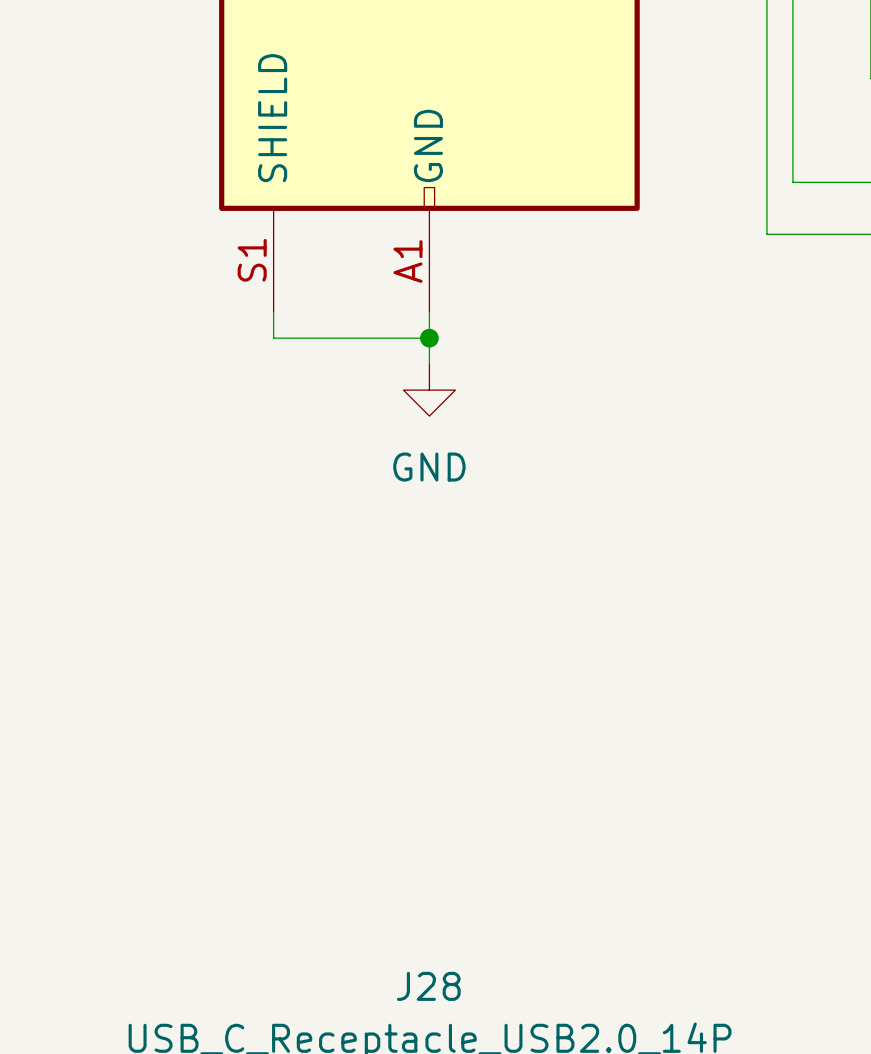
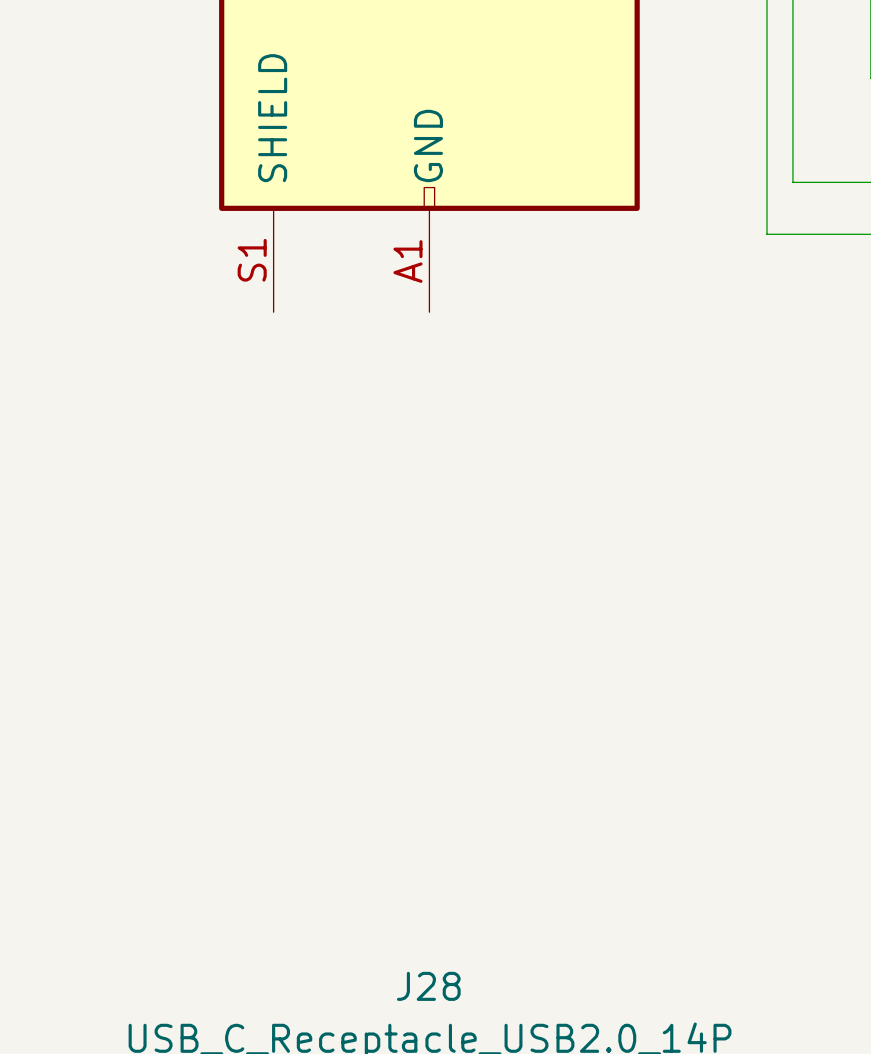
wire: (273, 312) (273, 338) (429, 338) -> none
wire: (429, 312) (429, 364) -> none
junction: (429, 338) -> none
power symbol: GND (429, 390) -> none

